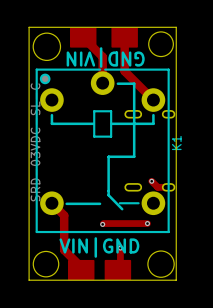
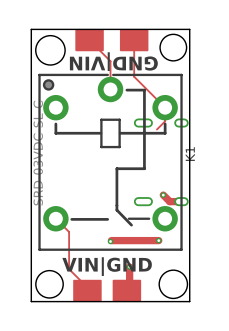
track width: thick (83, 37) (102, 56) (102, 83) -> thin (89, 40) (110, 61) (110, 89)
track width: thick (124, 37) (124, 71) (153, 100) -> thin (134, 40) (134, 76) (165, 107)
track: none -> (165, 107) (165, 121) (156, 129)
track width: thick (51, 203) (64, 215) (64, 250) (81, 267) -> thin (55, 218) (69, 231) (69, 269) (87, 287)

